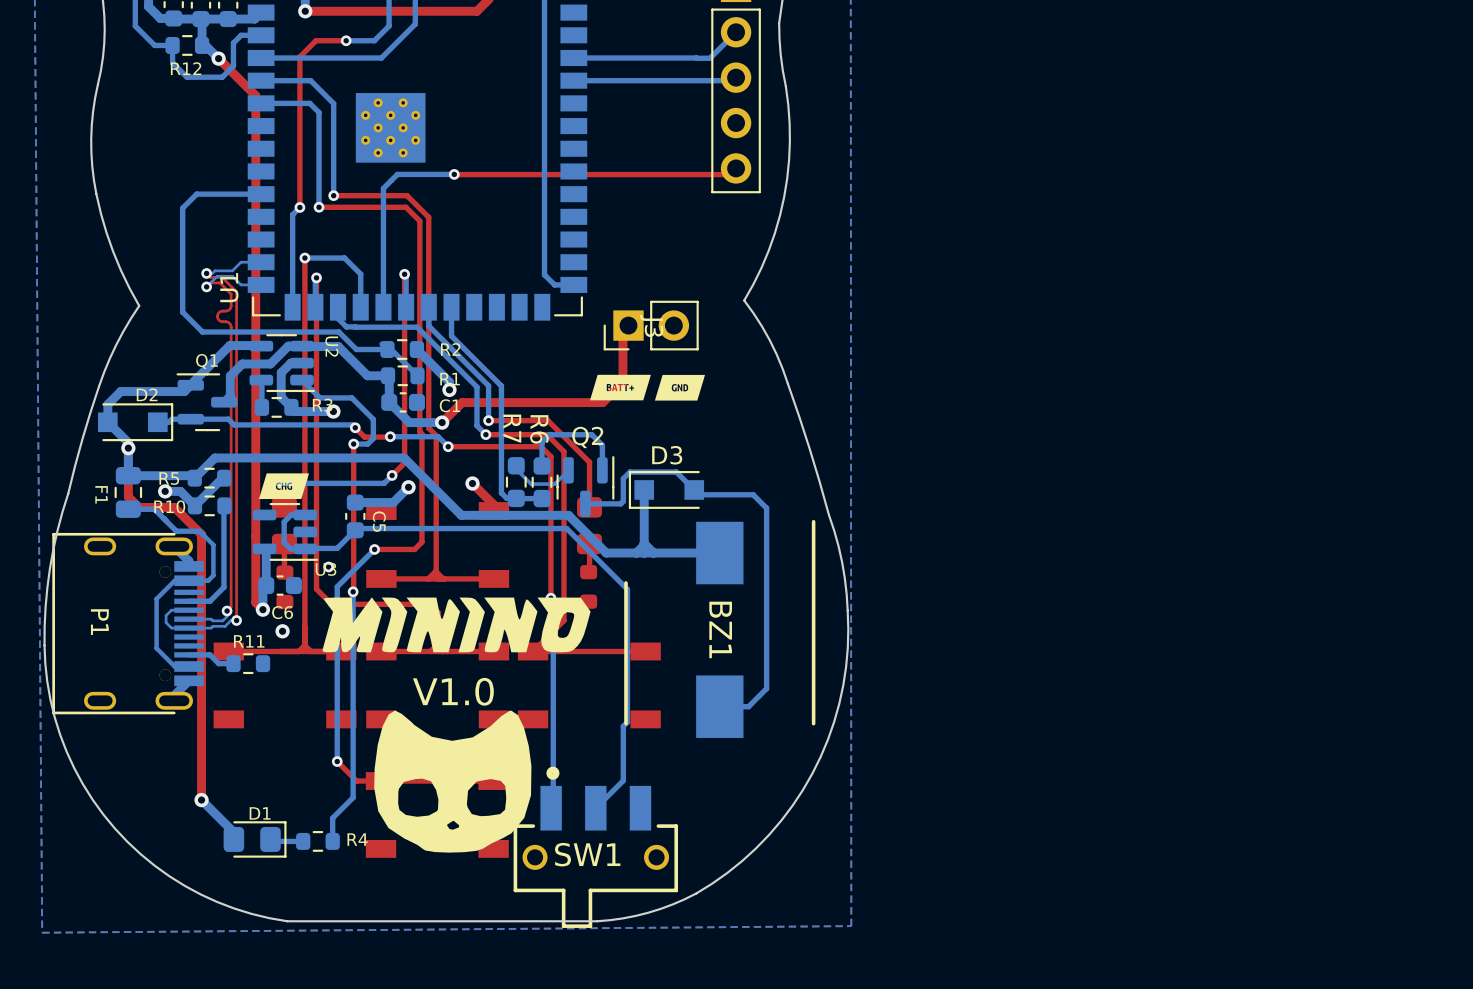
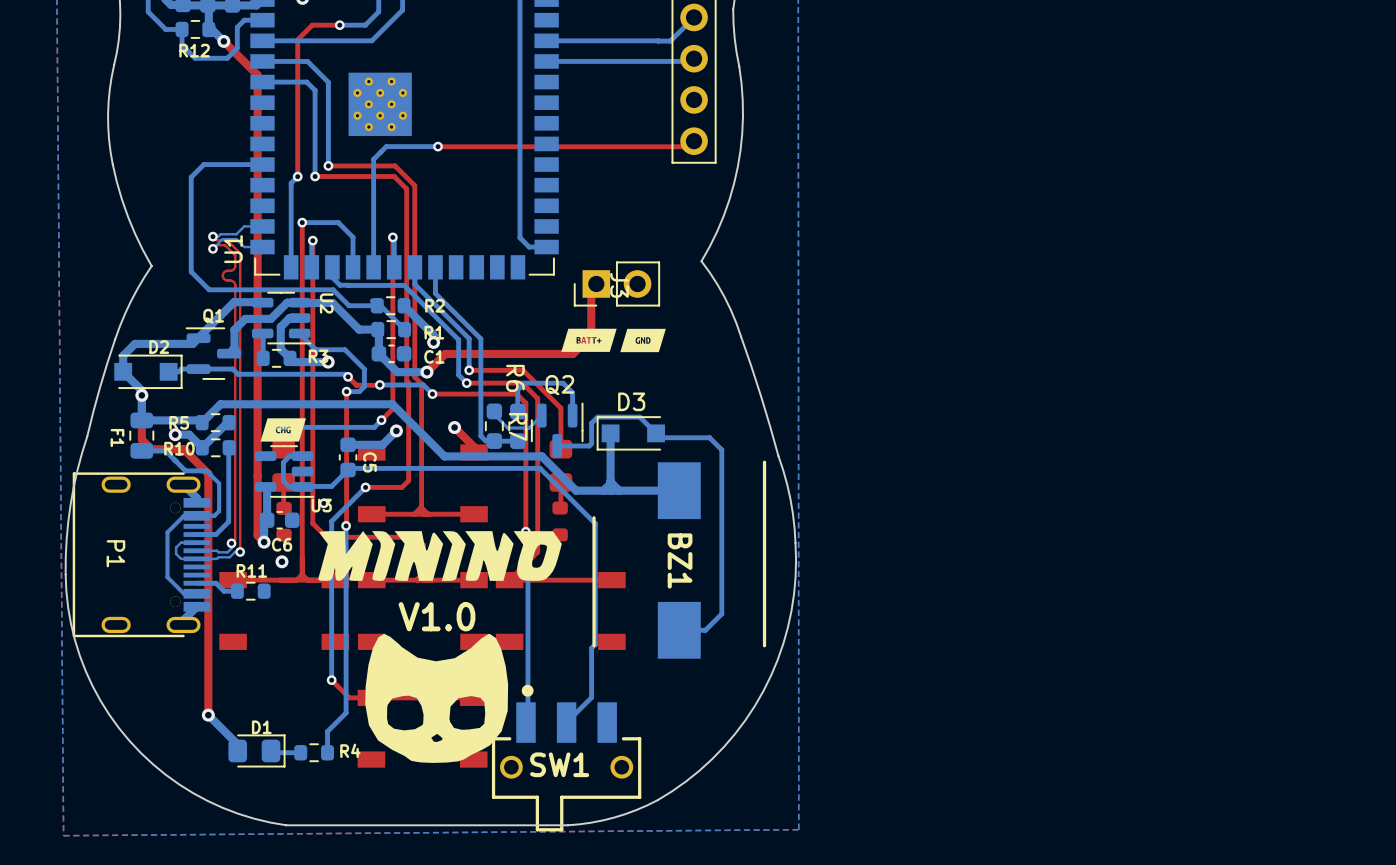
R7 name position: R7 (512, 428) -> R7 (518, 426)

